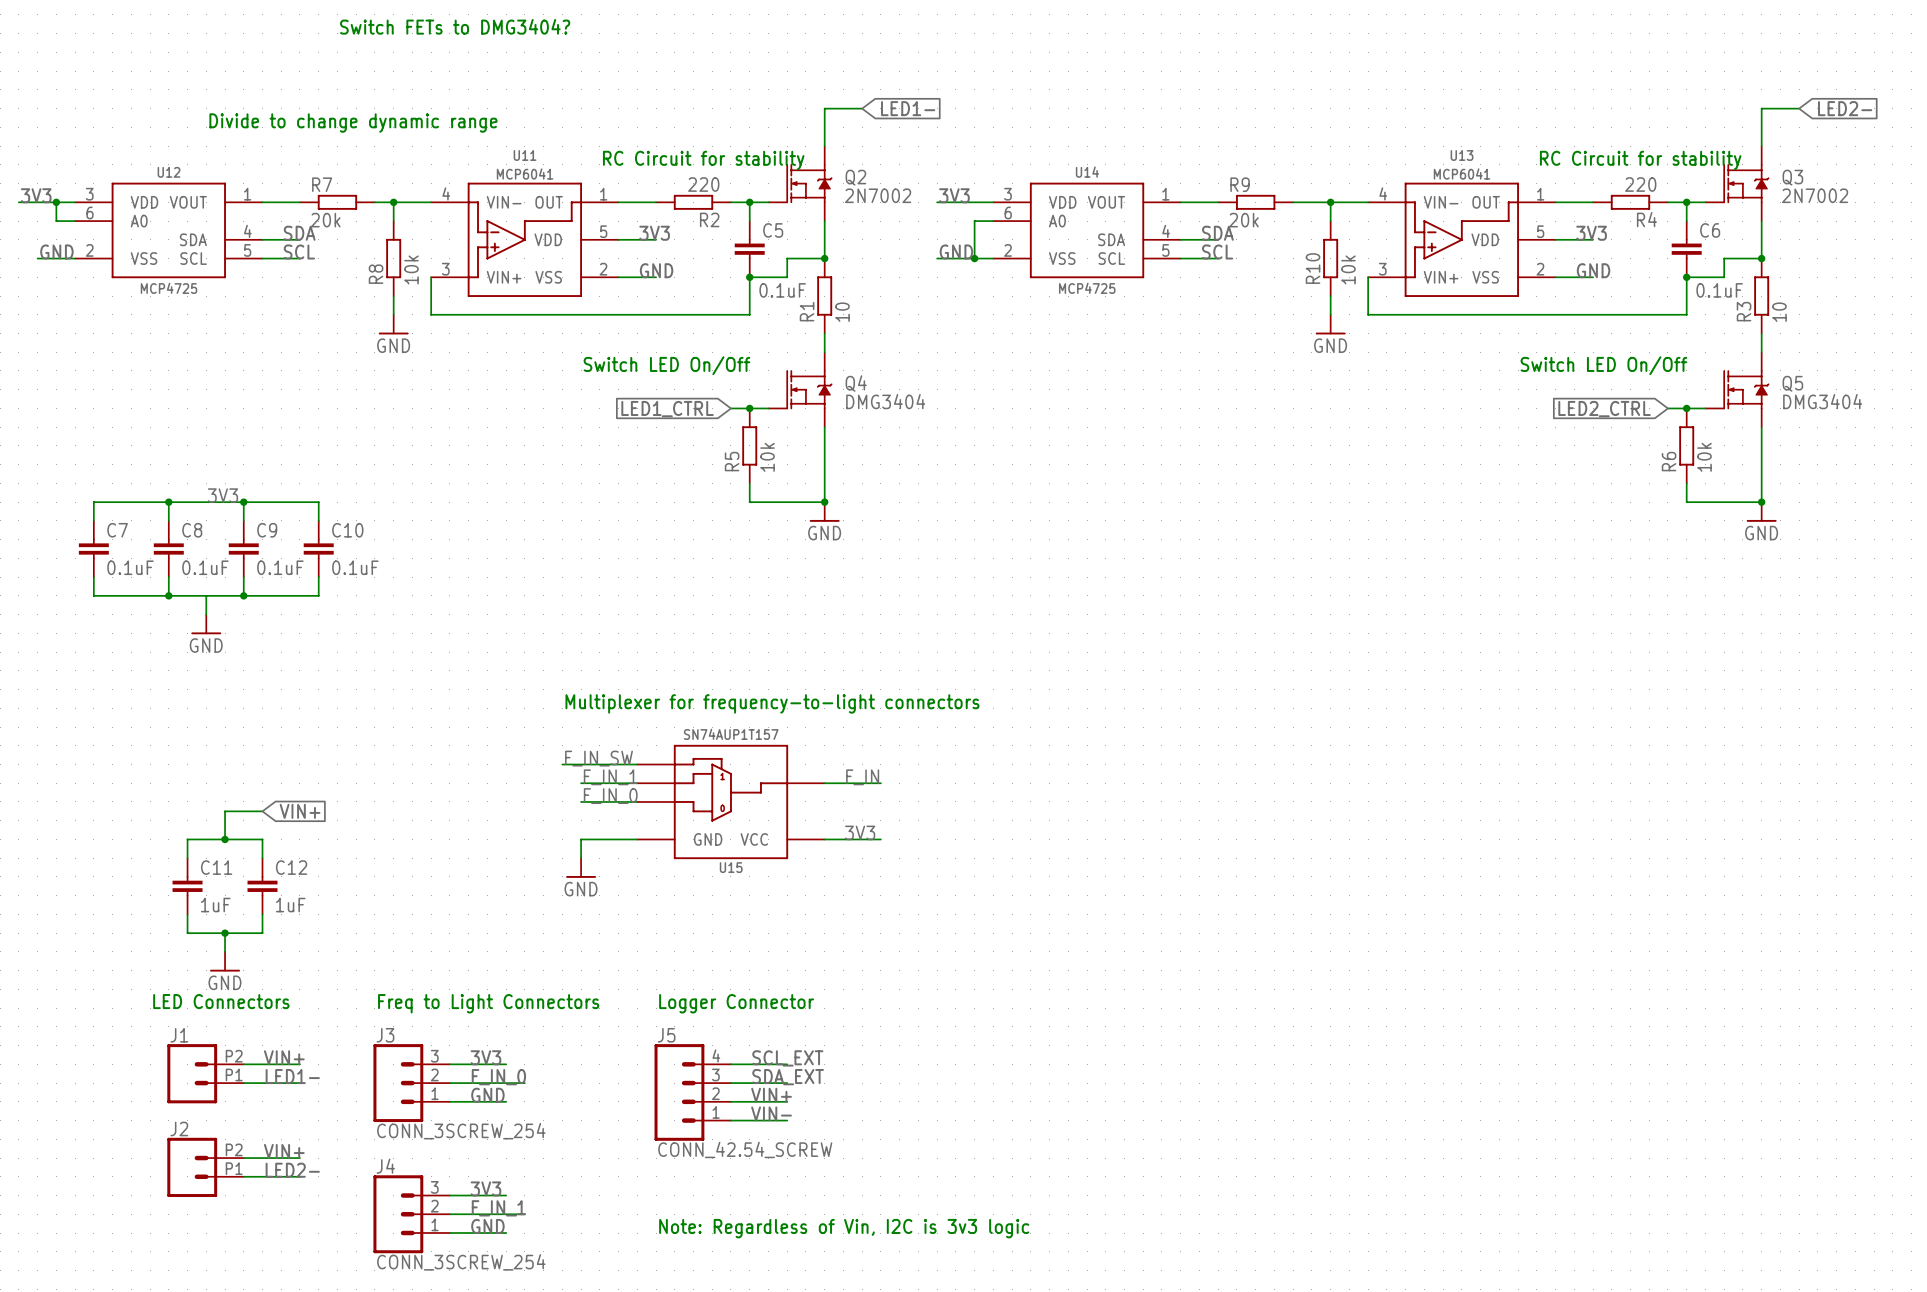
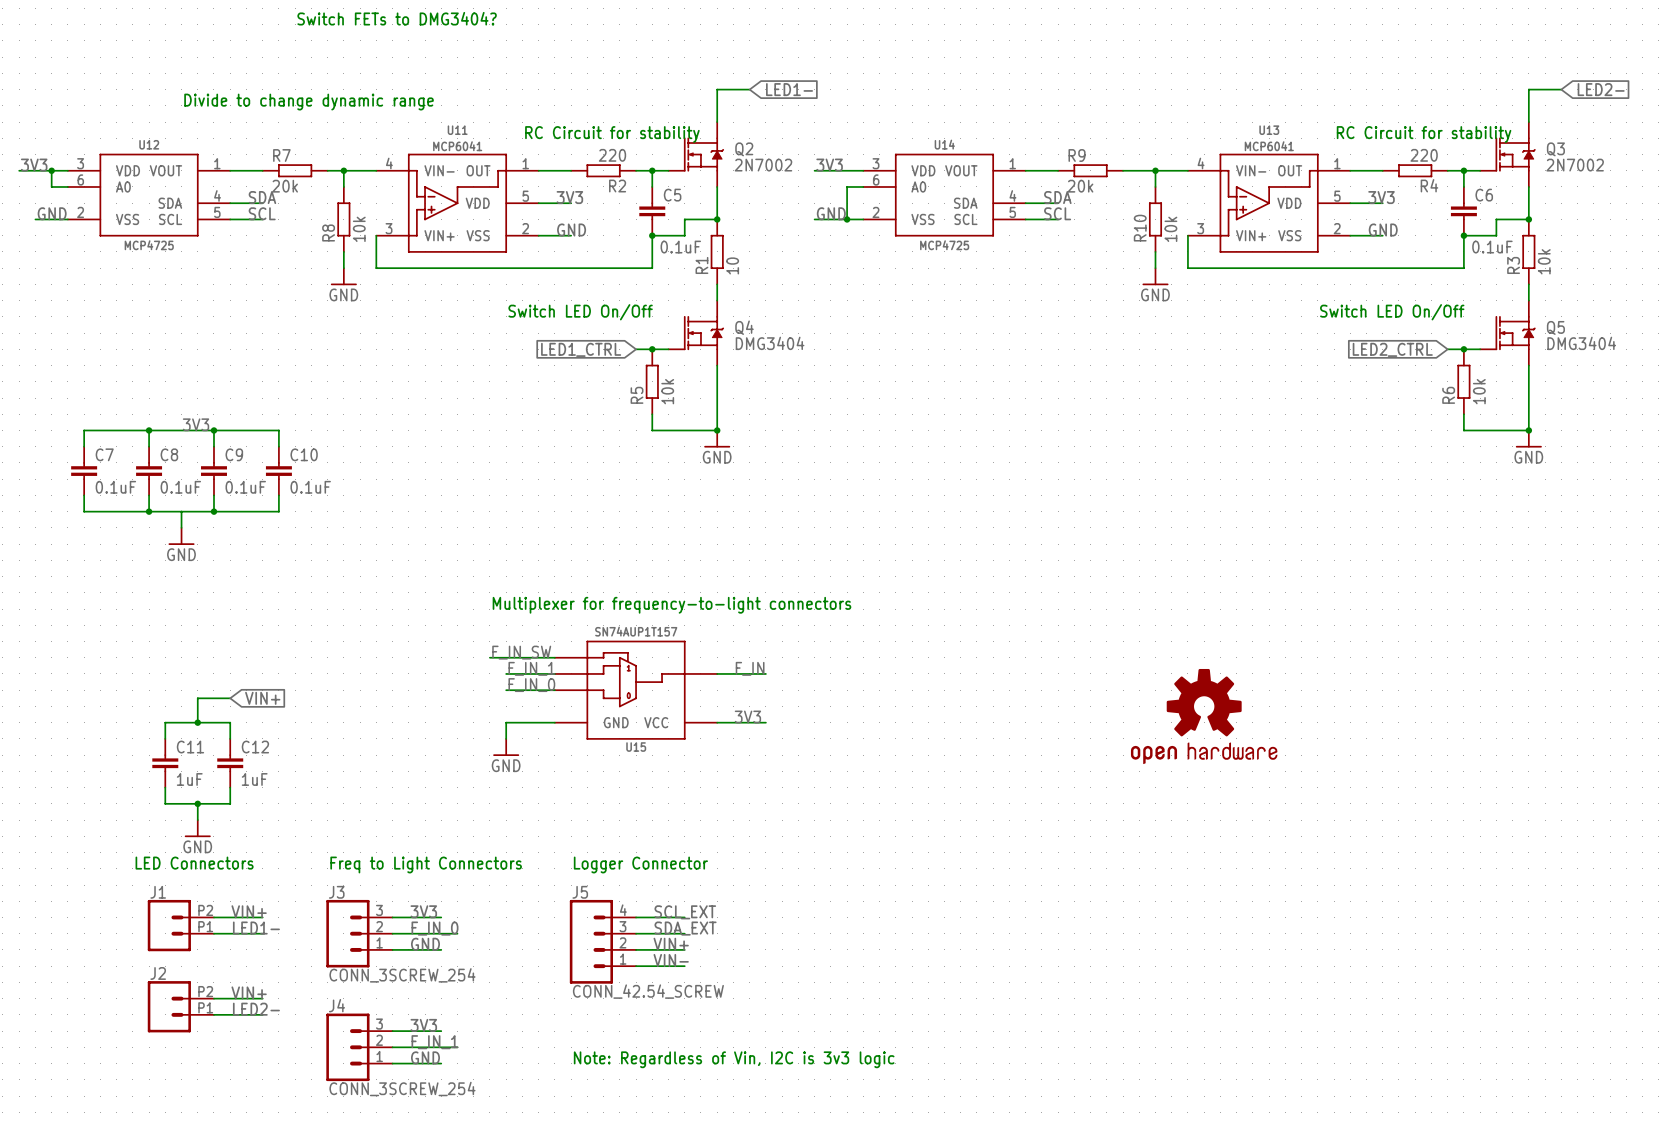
R3 value: 10 (1779, 312) -> 10k (1544, 261)
part: none -> (1204, 716)

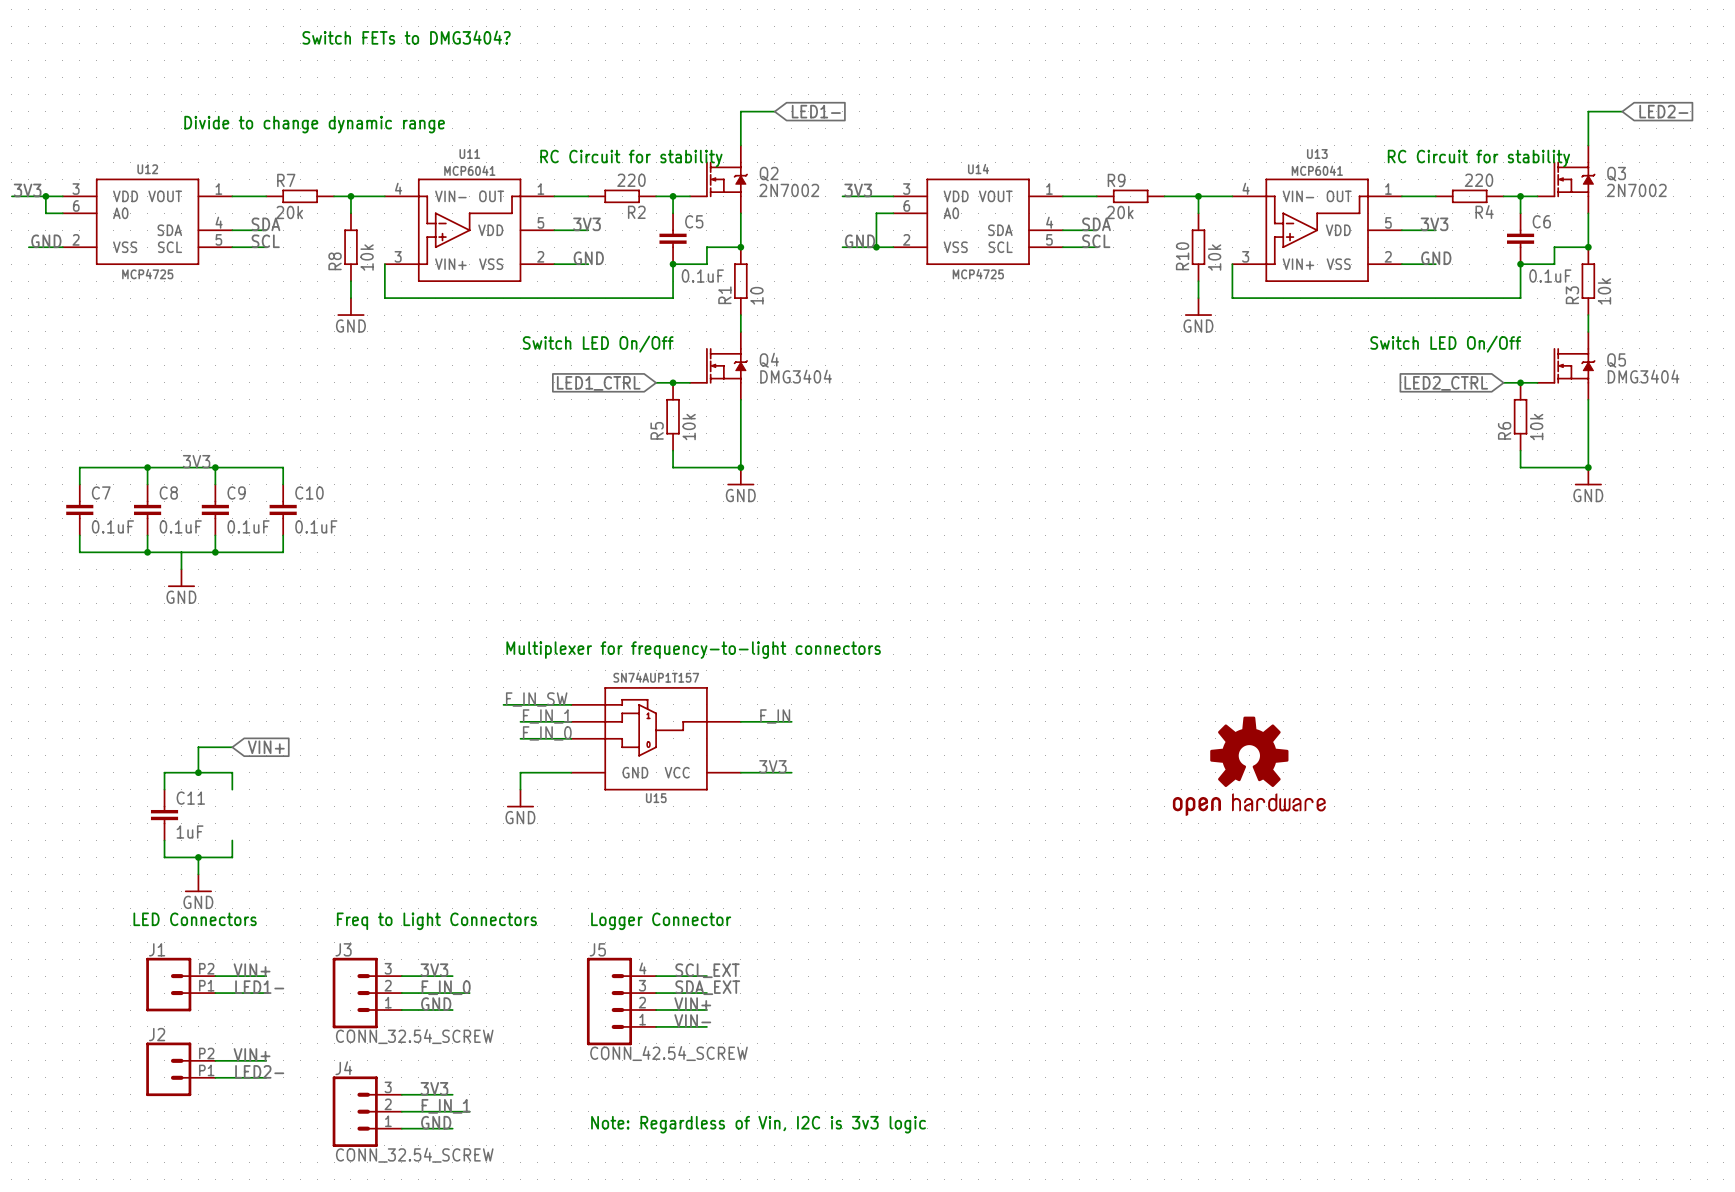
C12: 1uF (230, 763) -> none
J3 value: CONN_3SCREW_254 (402, 975) -> CONN_32.54_SCREW (414, 1036)
J4 value: CONN_3SCREW_254 (402, 1088) -> CONN_32.54_SCREW (414, 1155)

